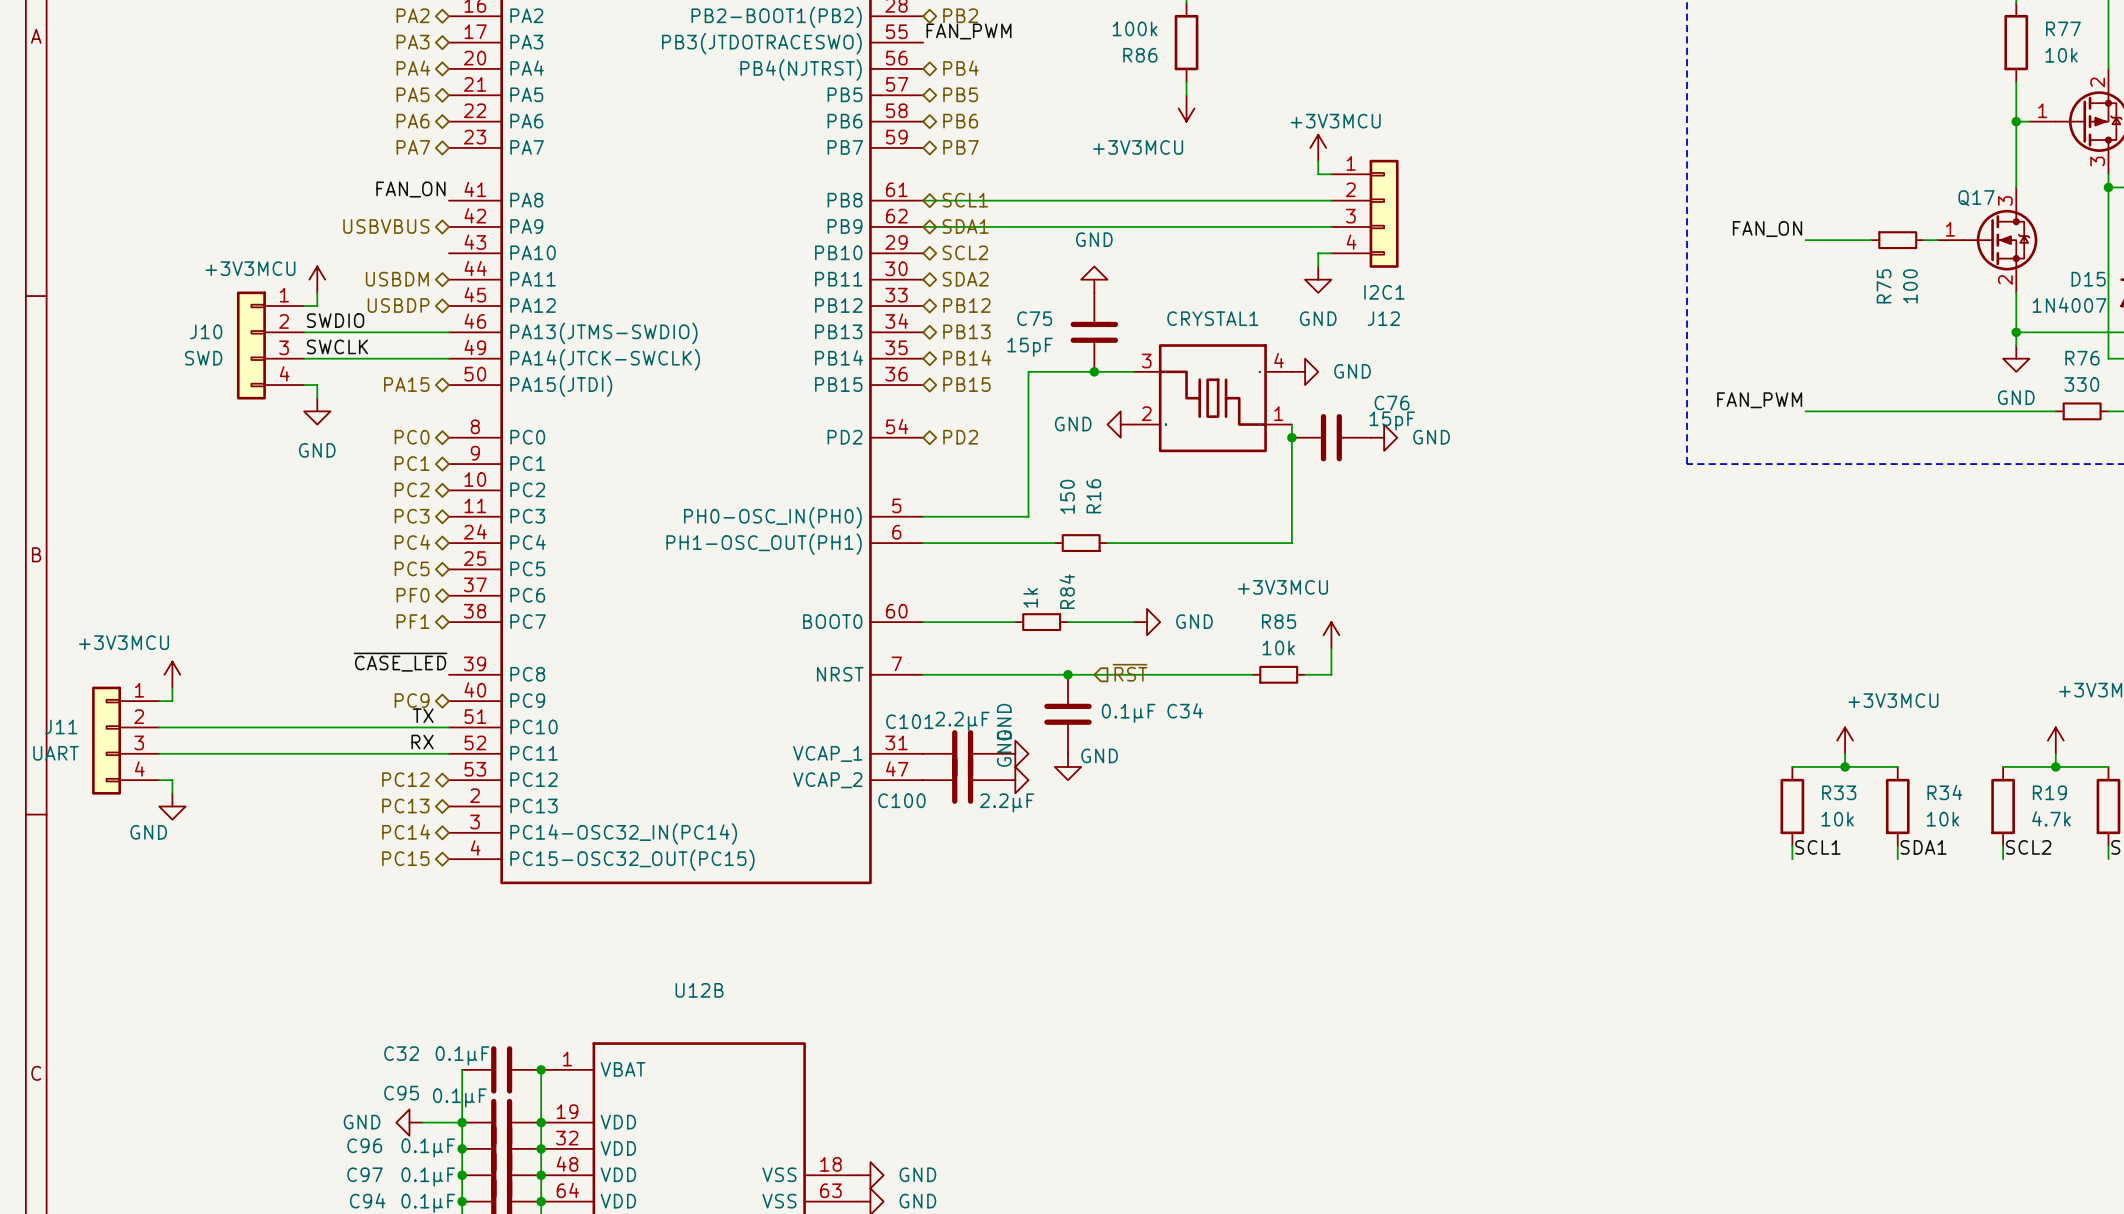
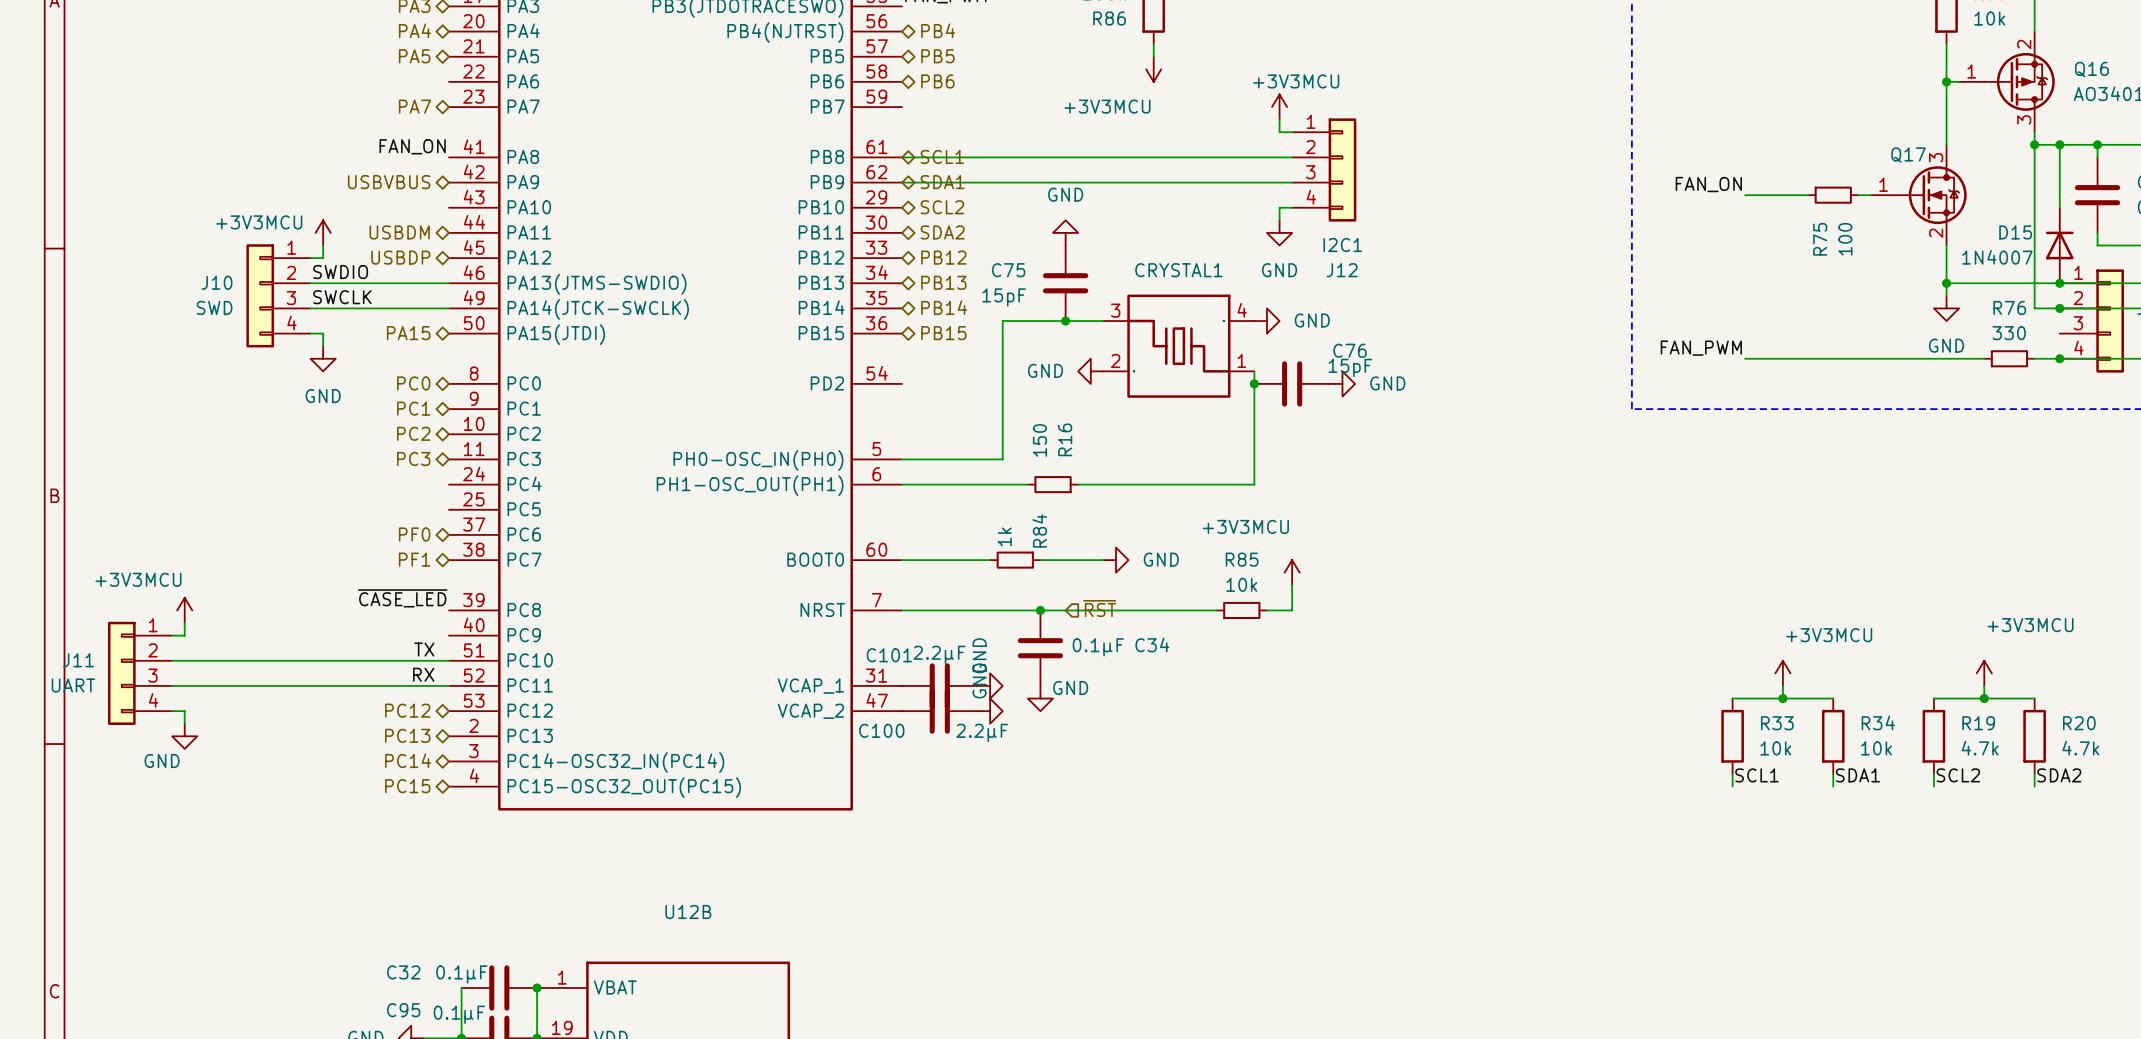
hierarchical label: PA6 (413, 121) -> none
hierarchical label: PB7 (960, 147) -> none
hierarchical label: PD2 (960, 437) -> none
hierarchical label: PC4 (412, 542) -> none
hierarchical label: PC5 (412, 568) -> none
hierarchical label: PC9 (412, 700) -> none

